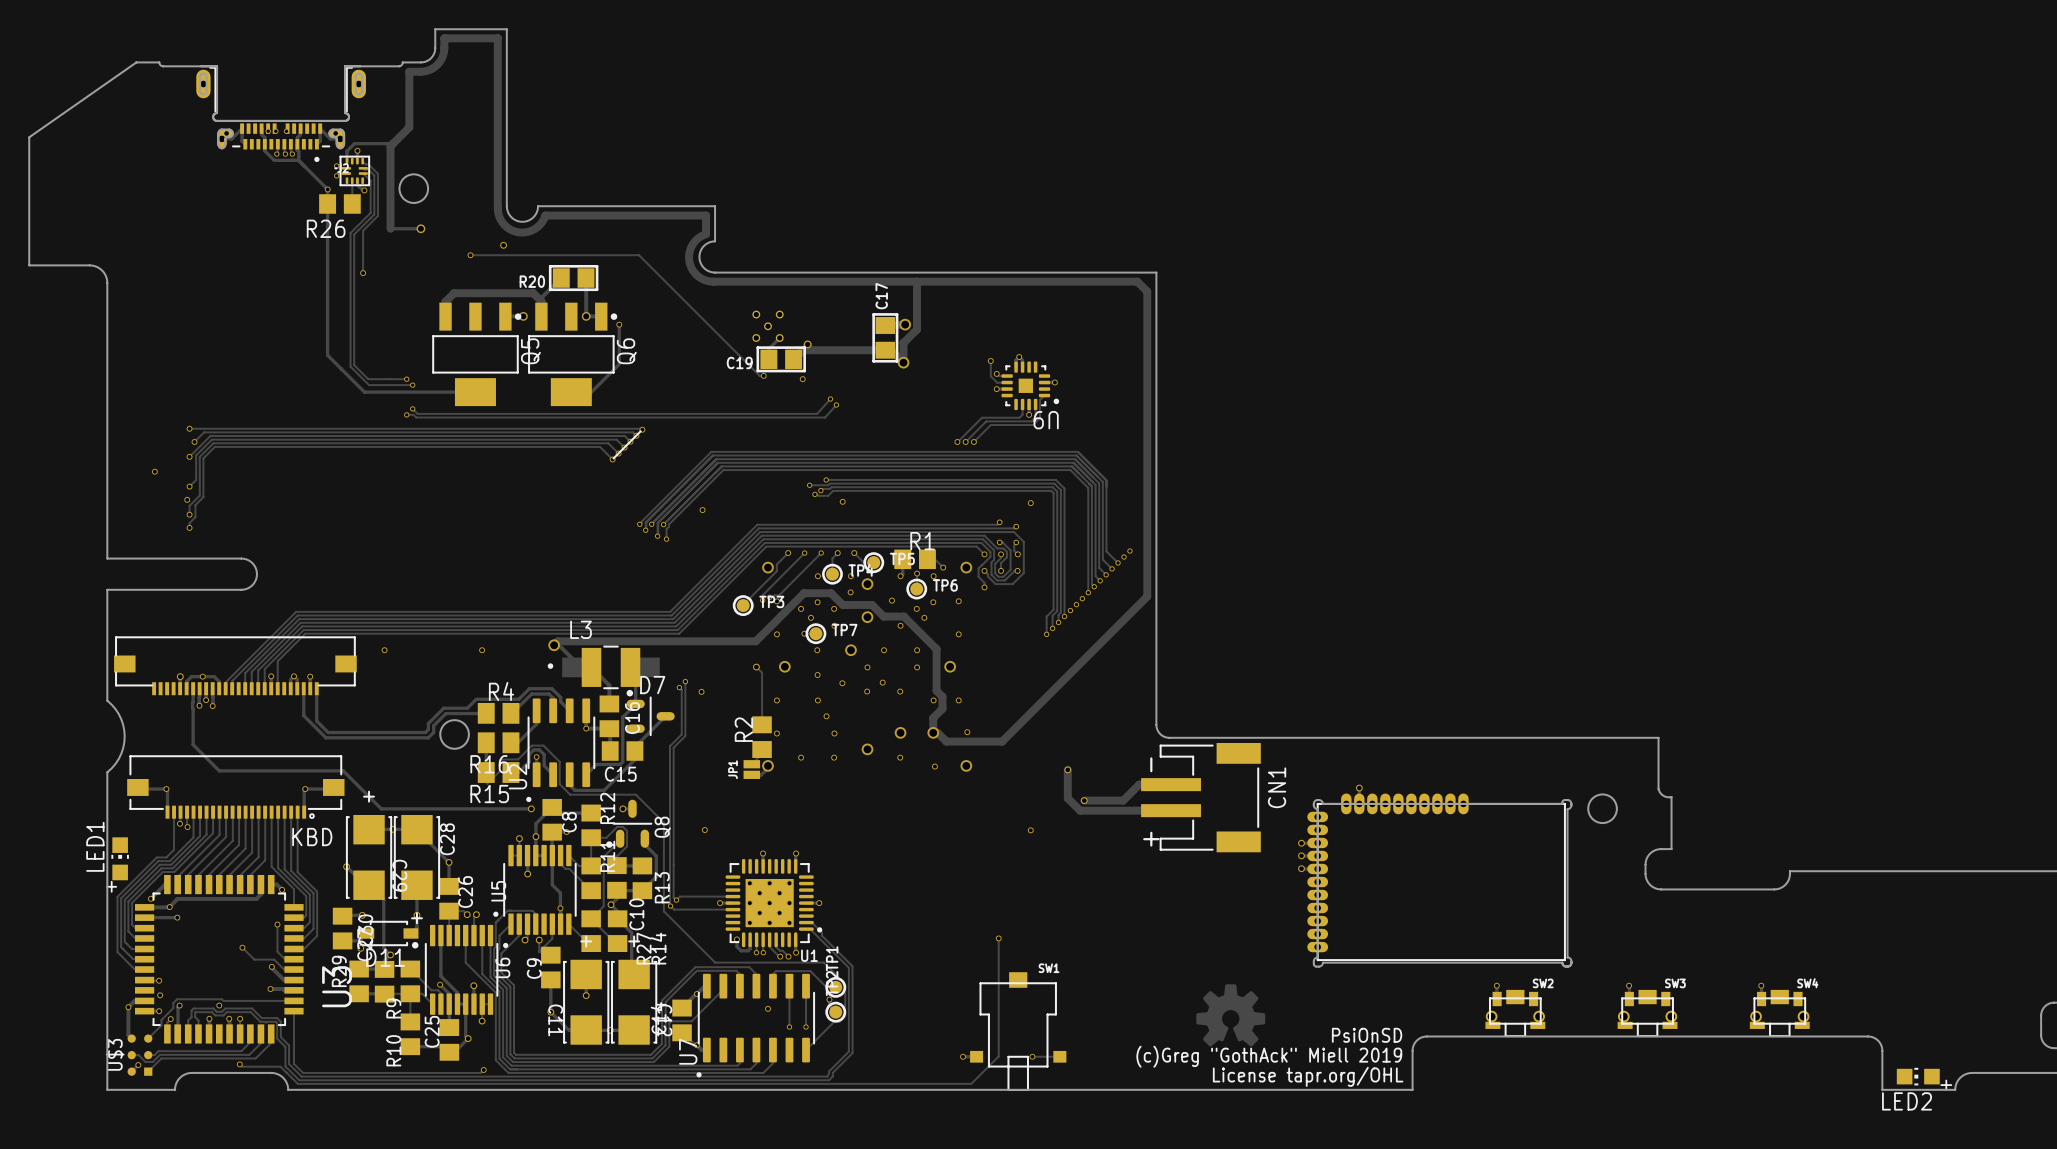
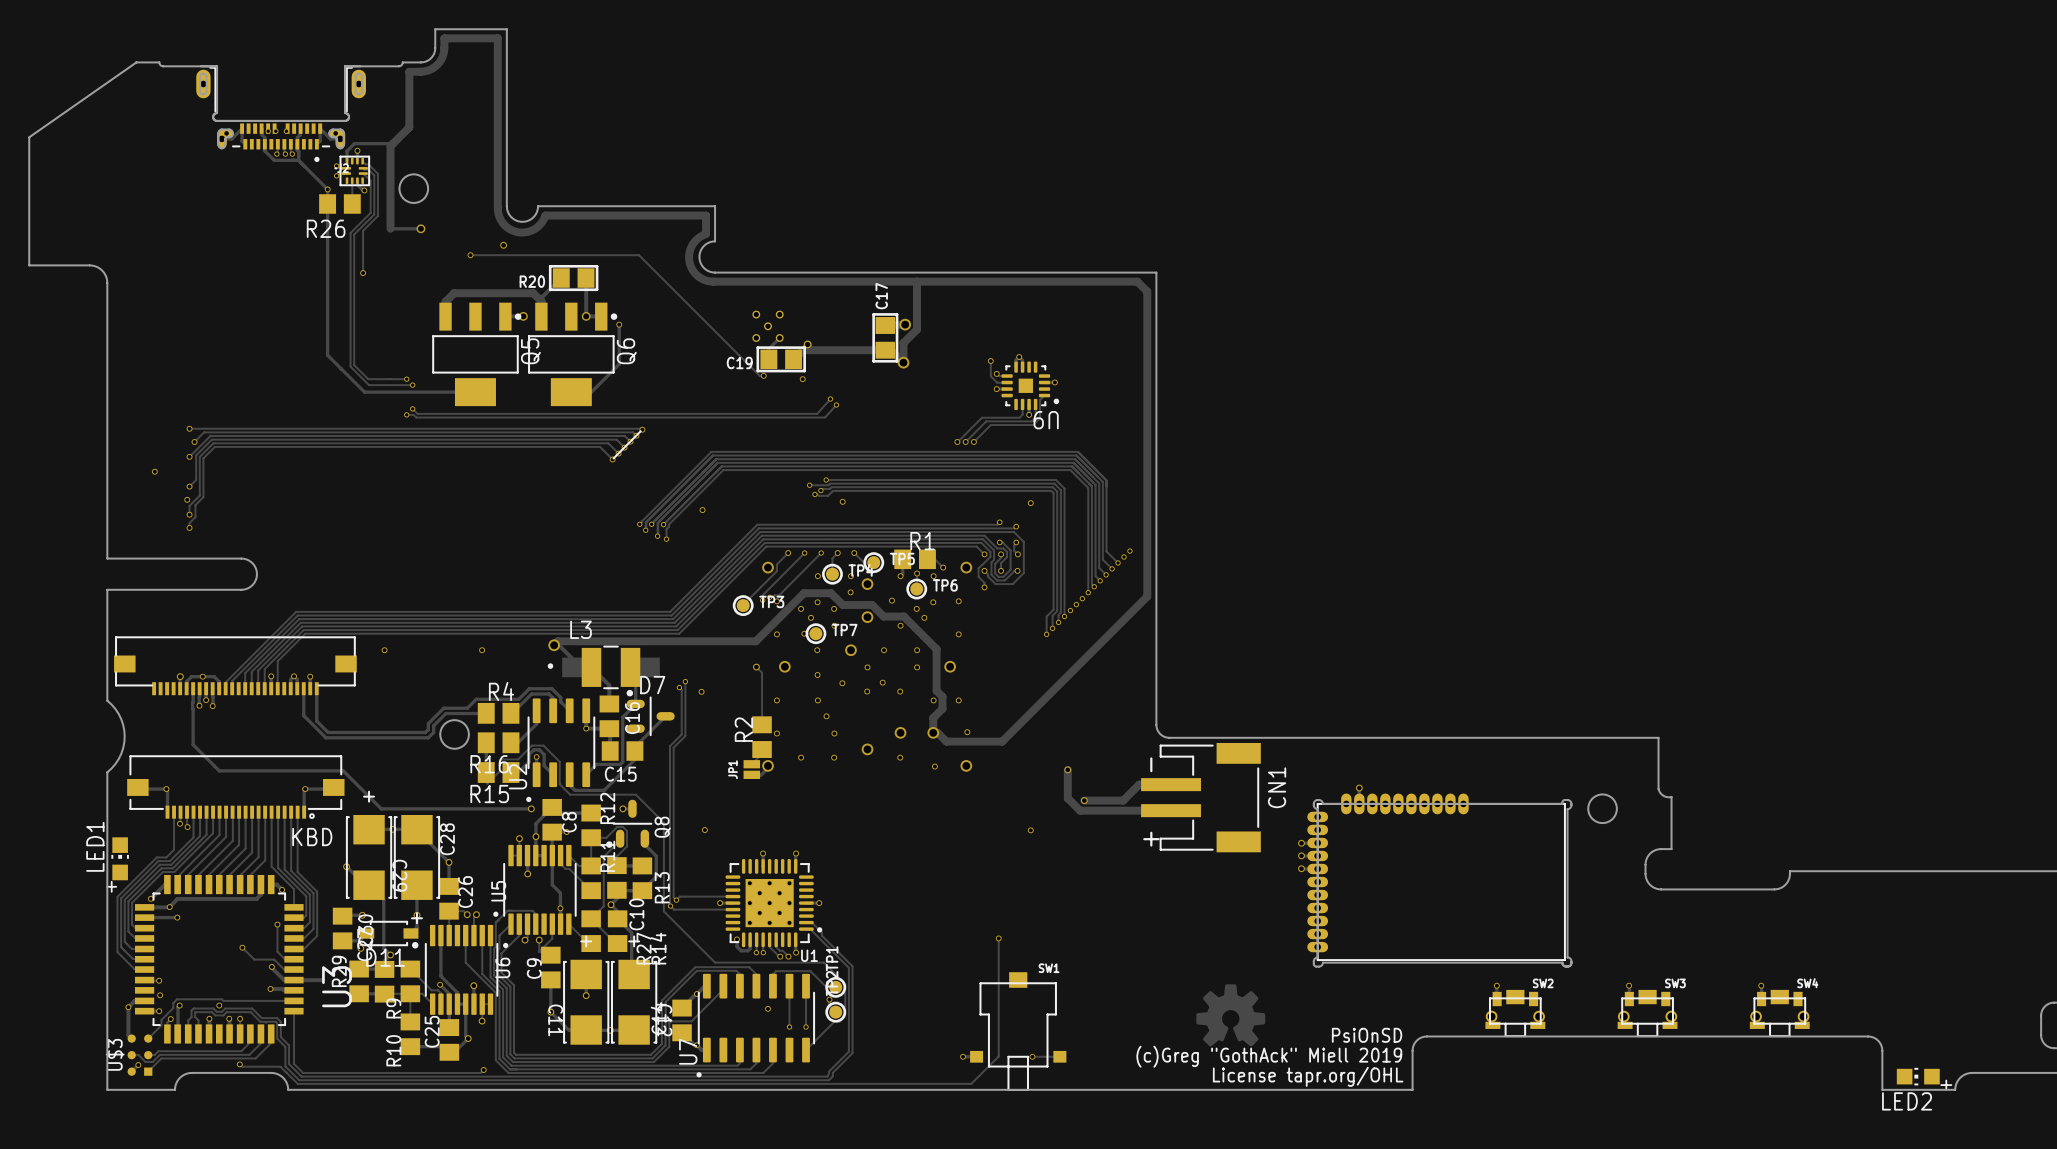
track: none -> (294, 980) (321, 980)

